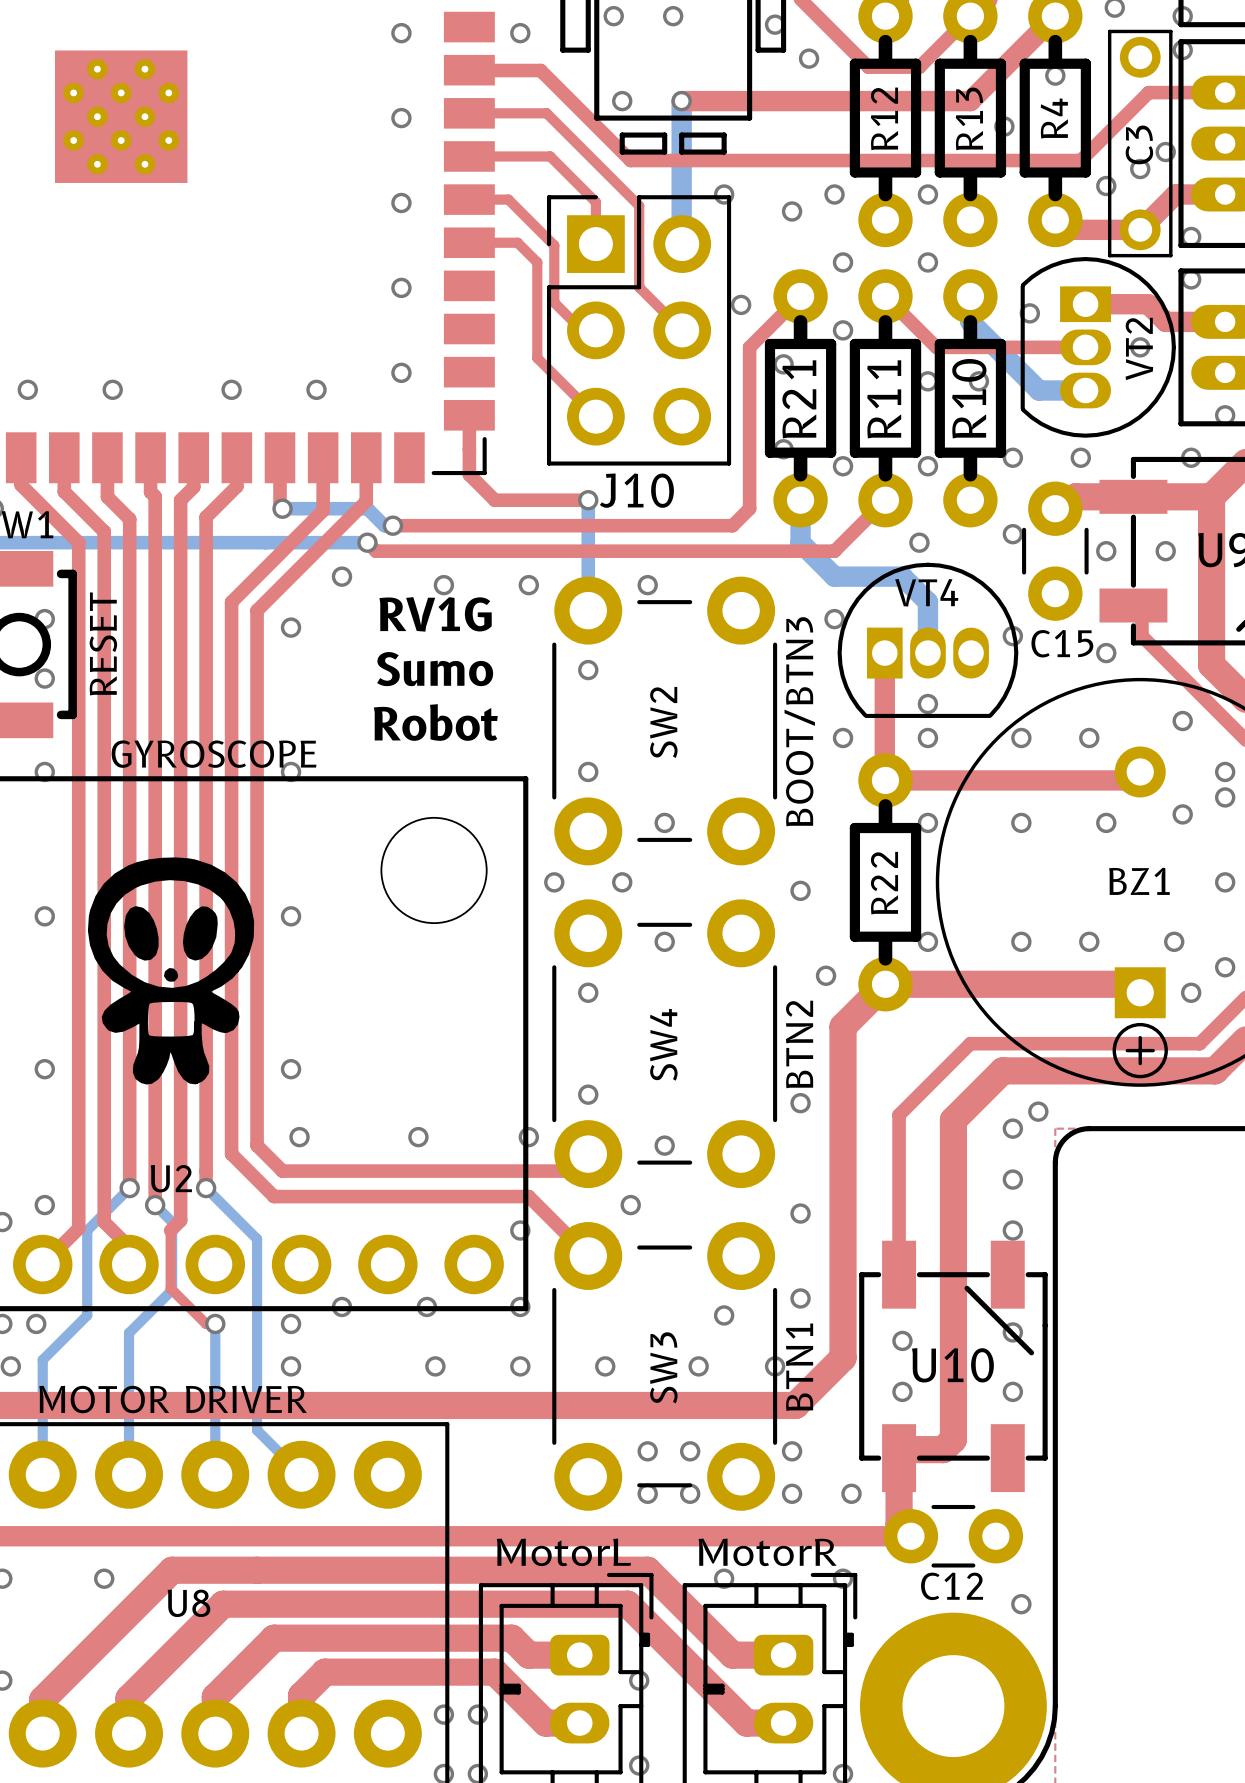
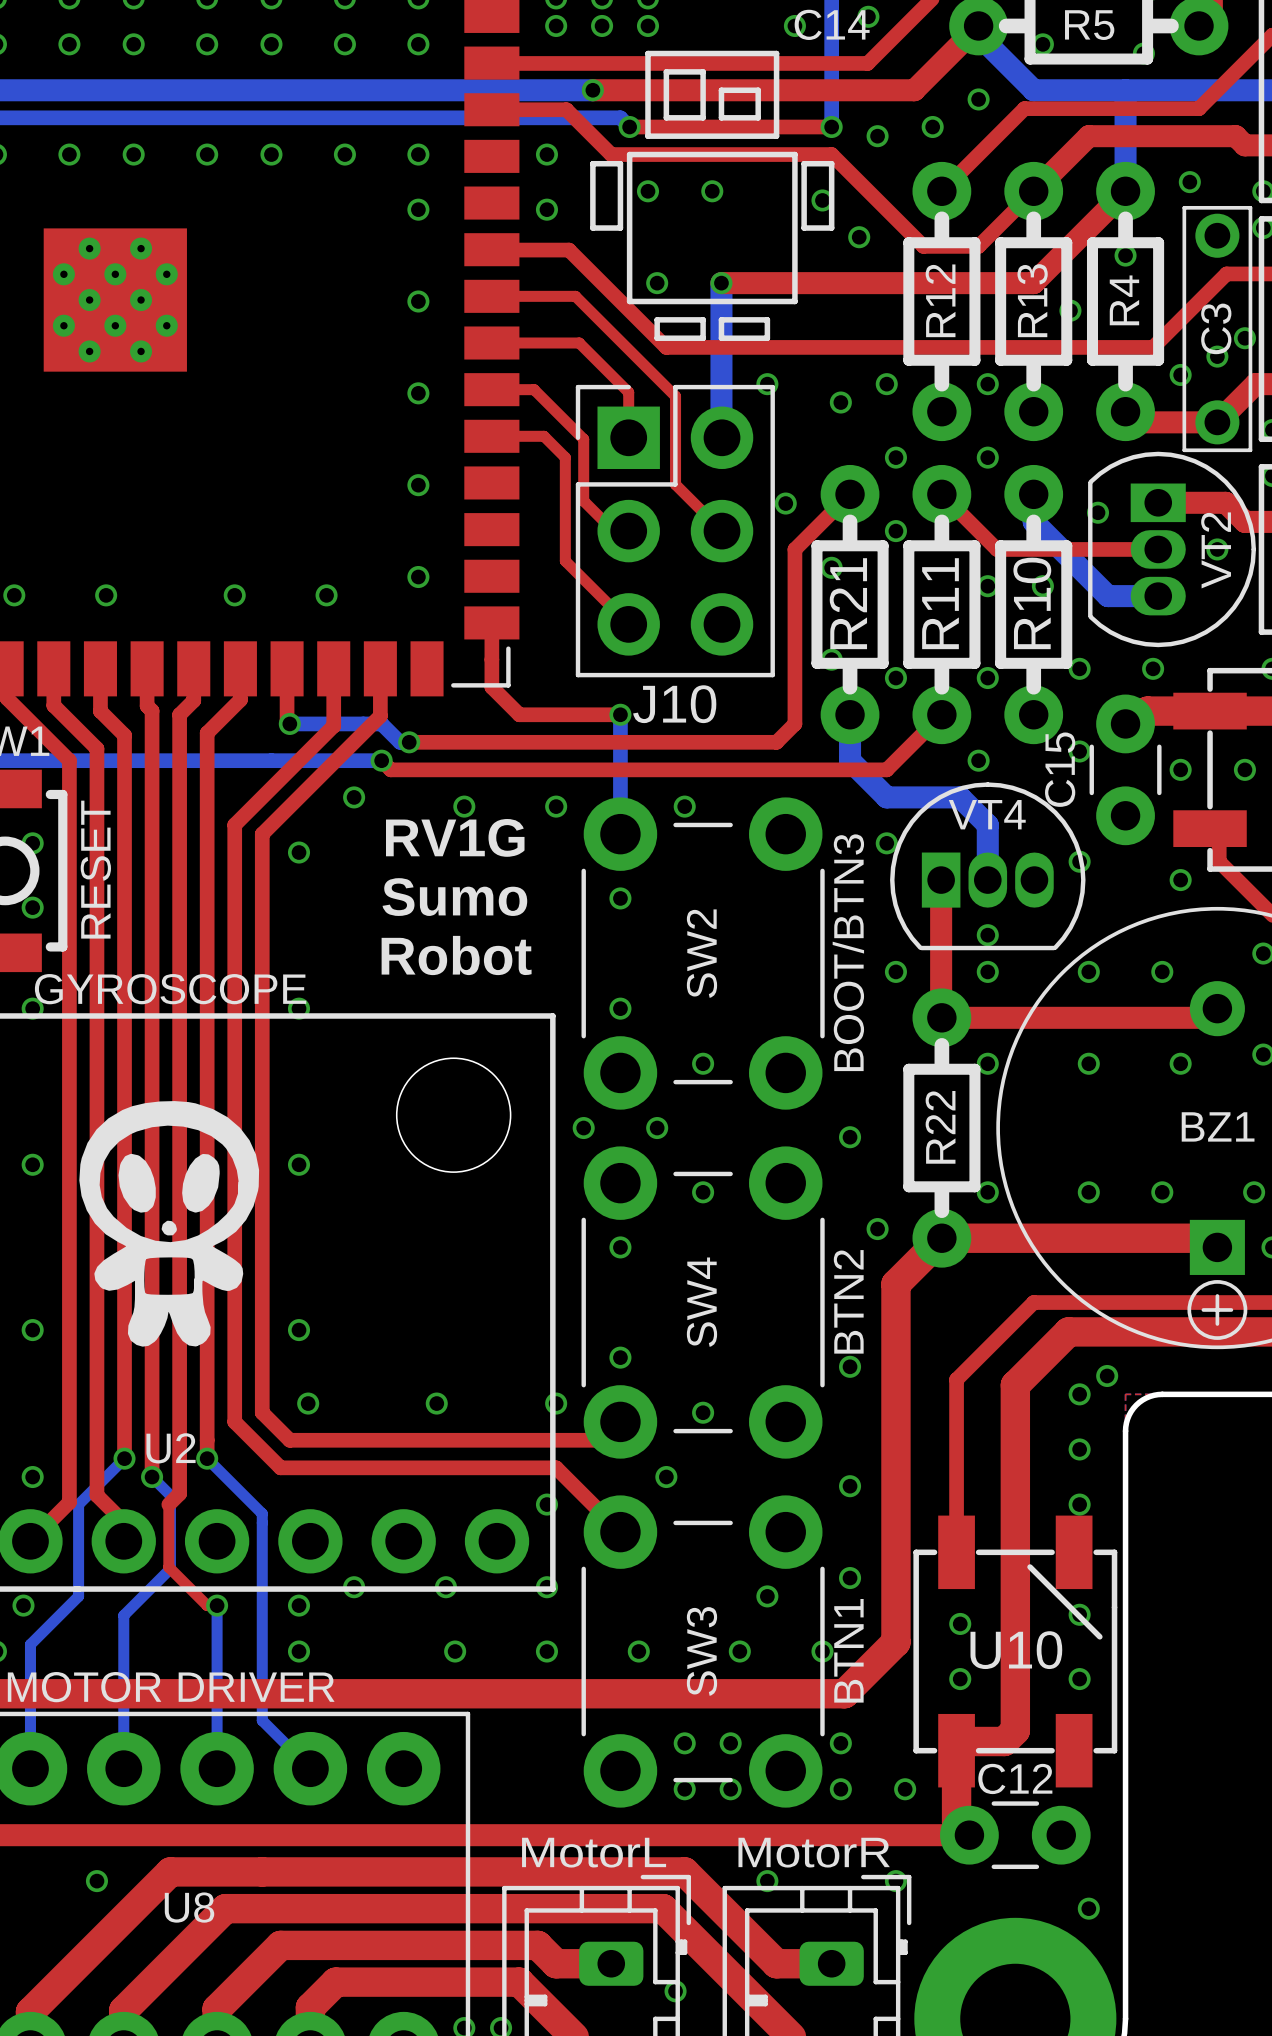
C15 name rotation: 0° (1062, 643) -> 90° counterclockwise (1060, 769)
C15 name position: C15 (1062, 643) -> C15 (1060, 769)
text position: GYROSCOPE (214, 754) -> GYROSCOPE (170, 989)
C12 name position: C12 (952, 1586) -> C12 (1015, 1778)

